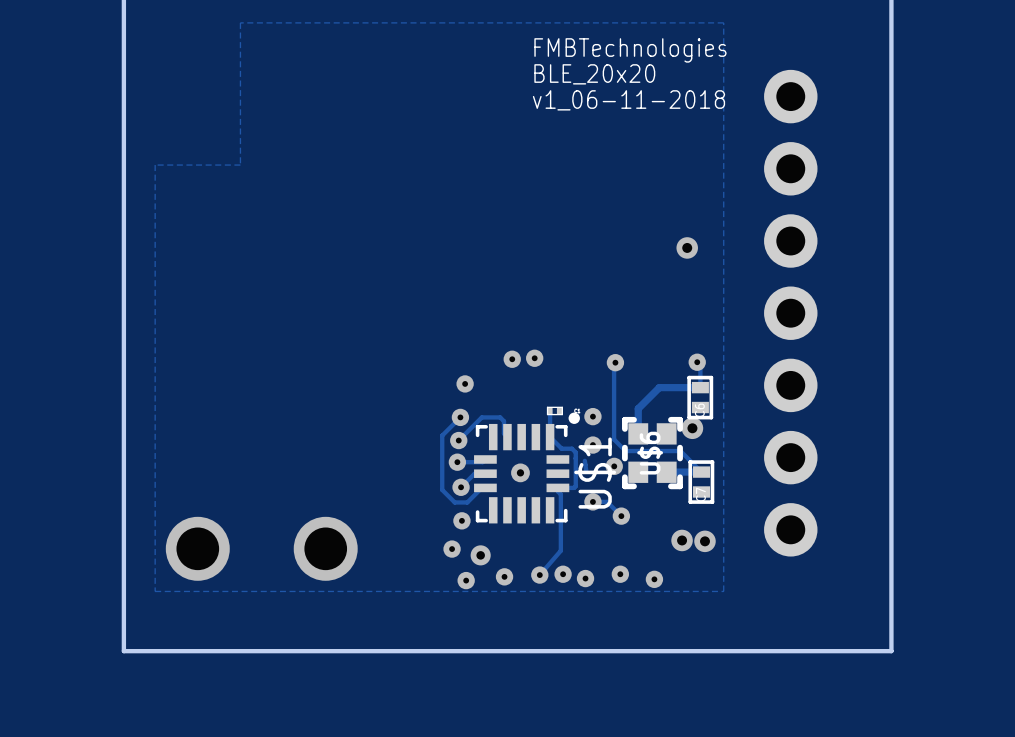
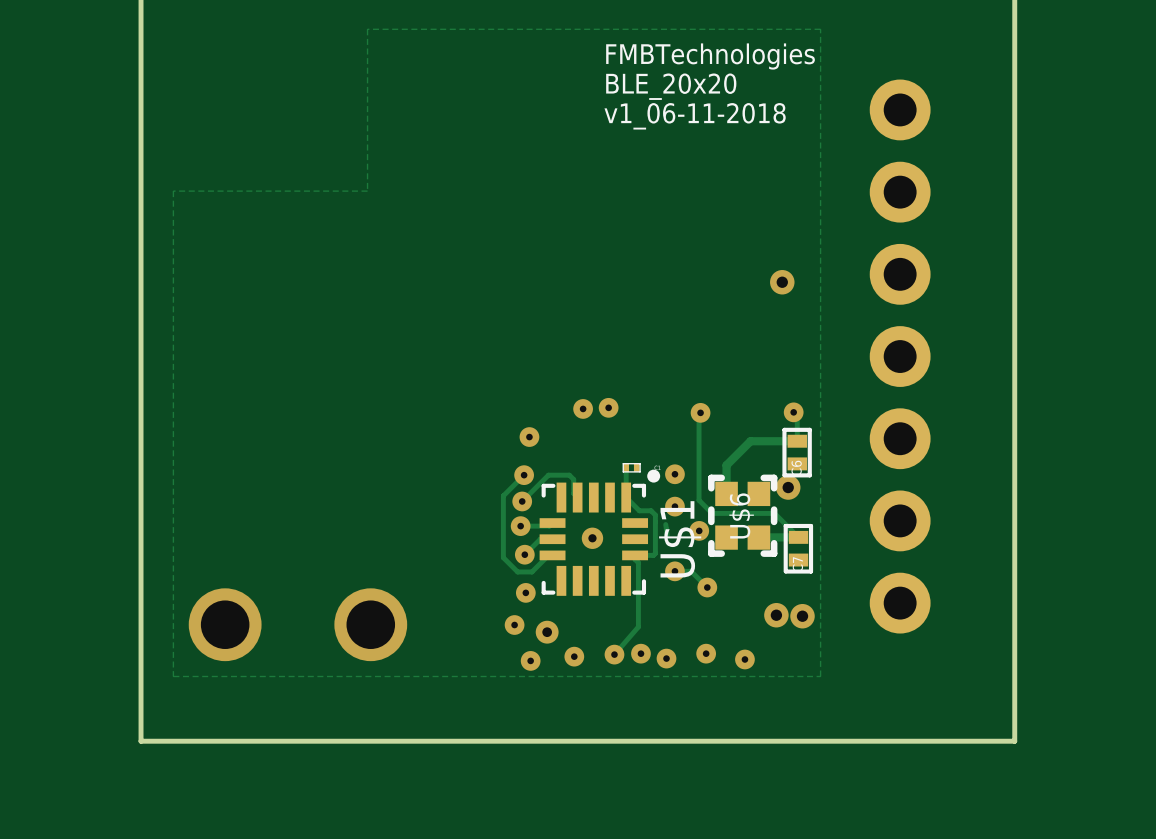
zone outline: (723, 22) (723, 591) (155, 591) (155, 165) (240, 165) (240, 22) (723, 22) -> (820, 29) (820, 676) (173, 676) (173, 191) (367, 191) (367, 29) (820, 29)

